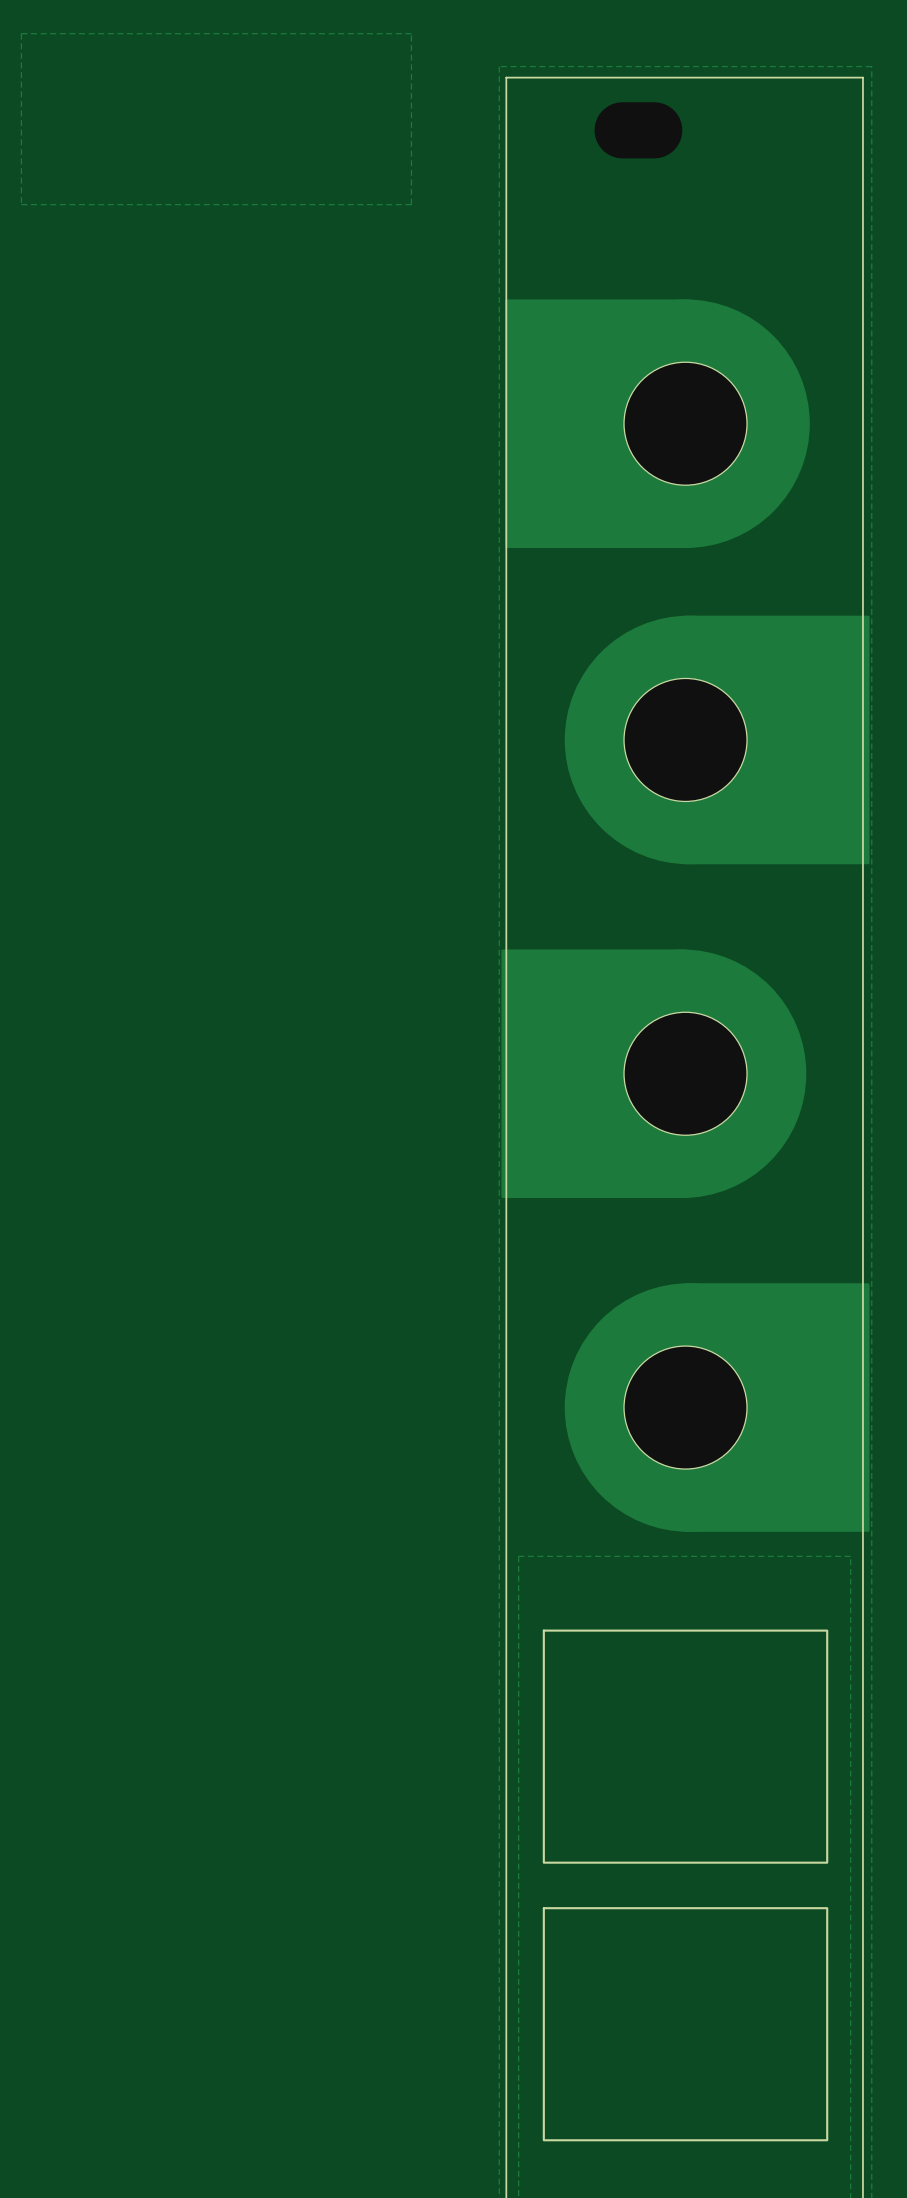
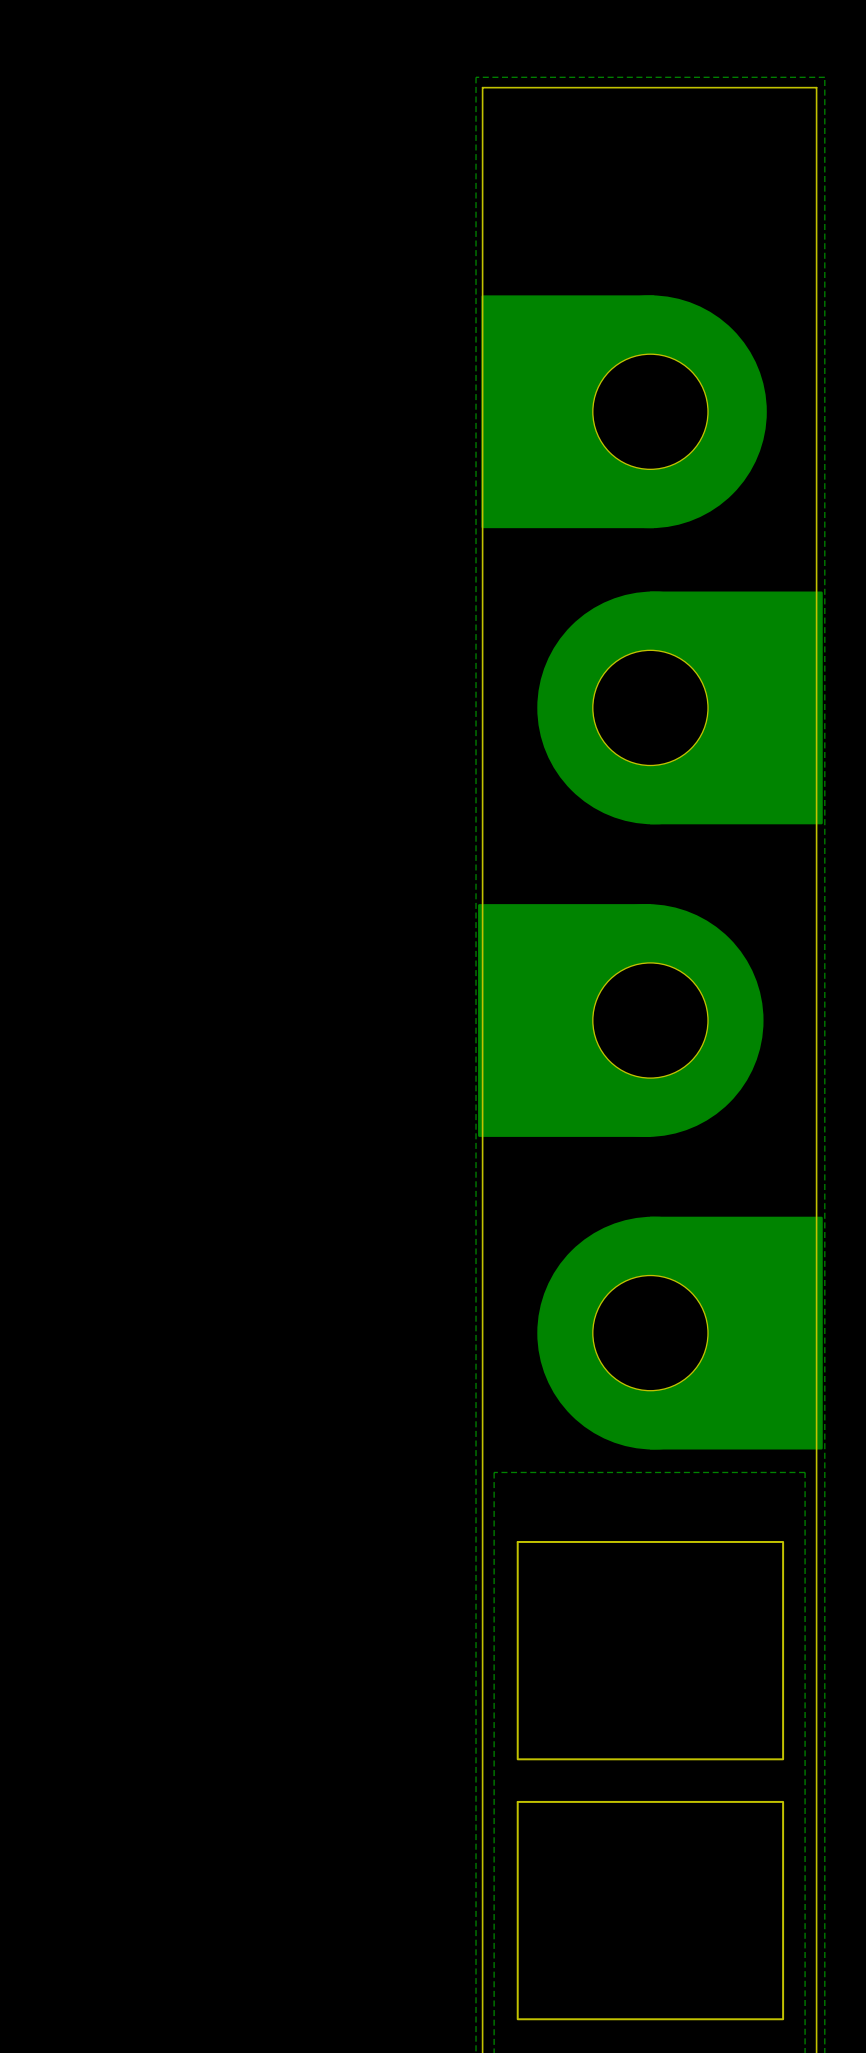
zone outline: (411, 33) (411, 204) (21, 204) (21, 33) (411, 33) -> none

